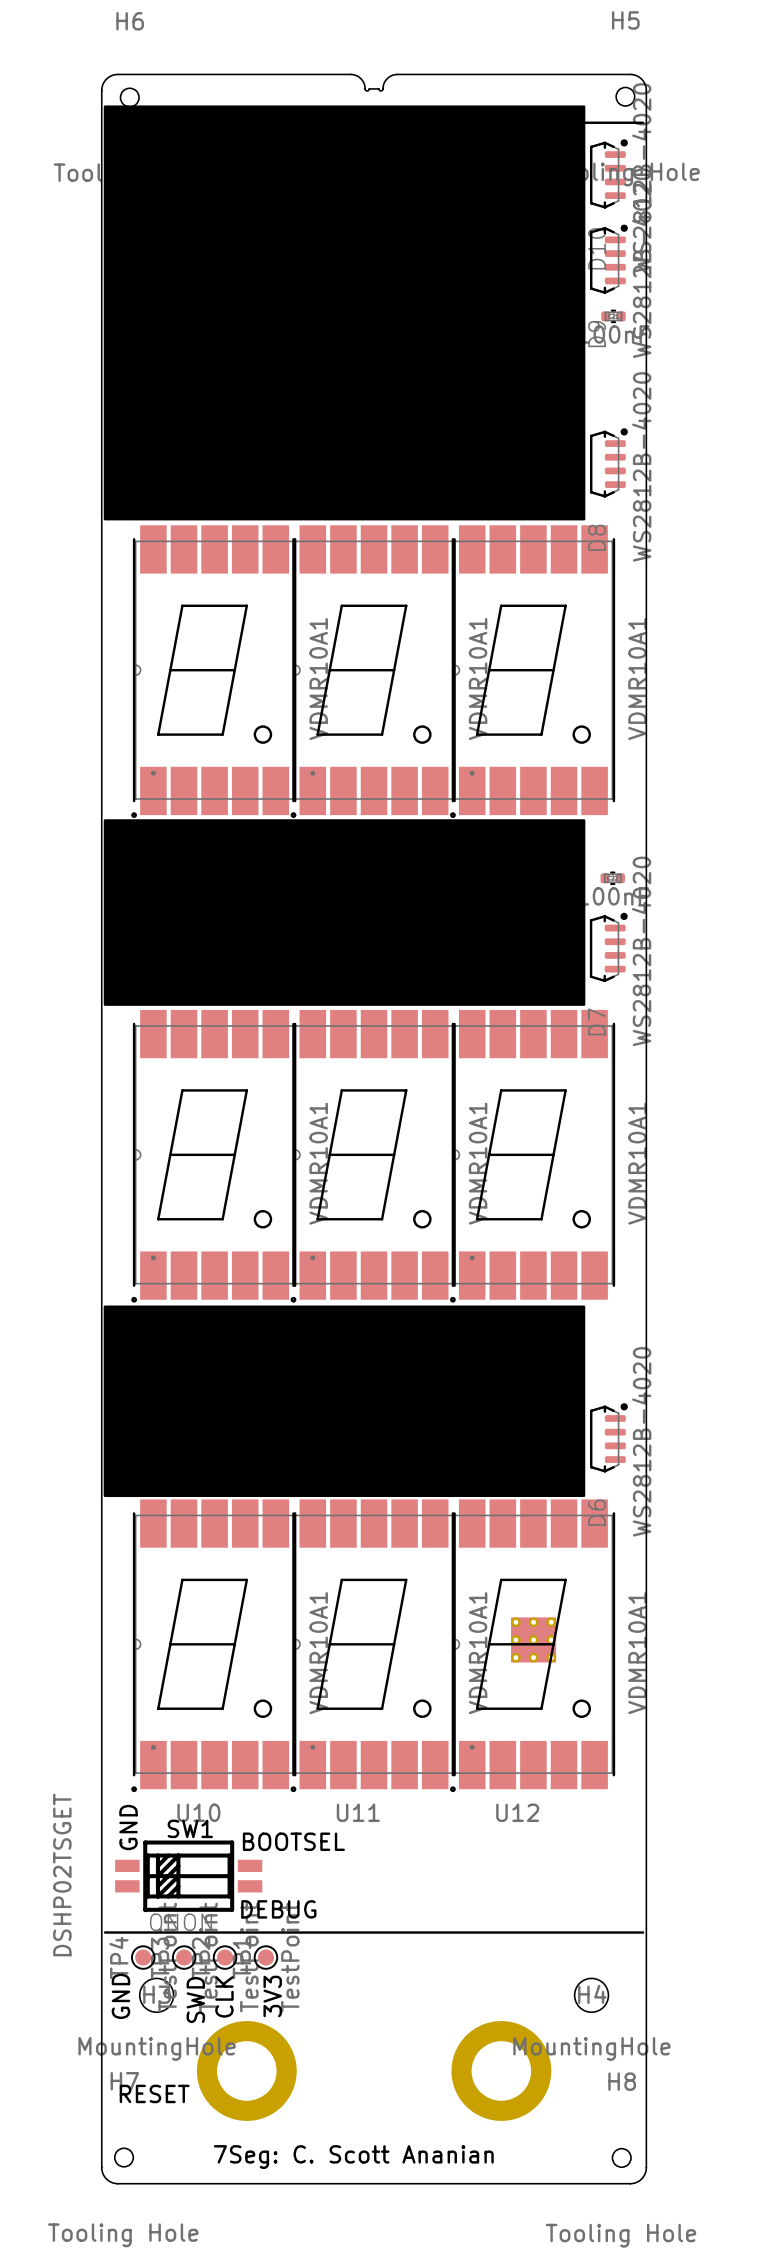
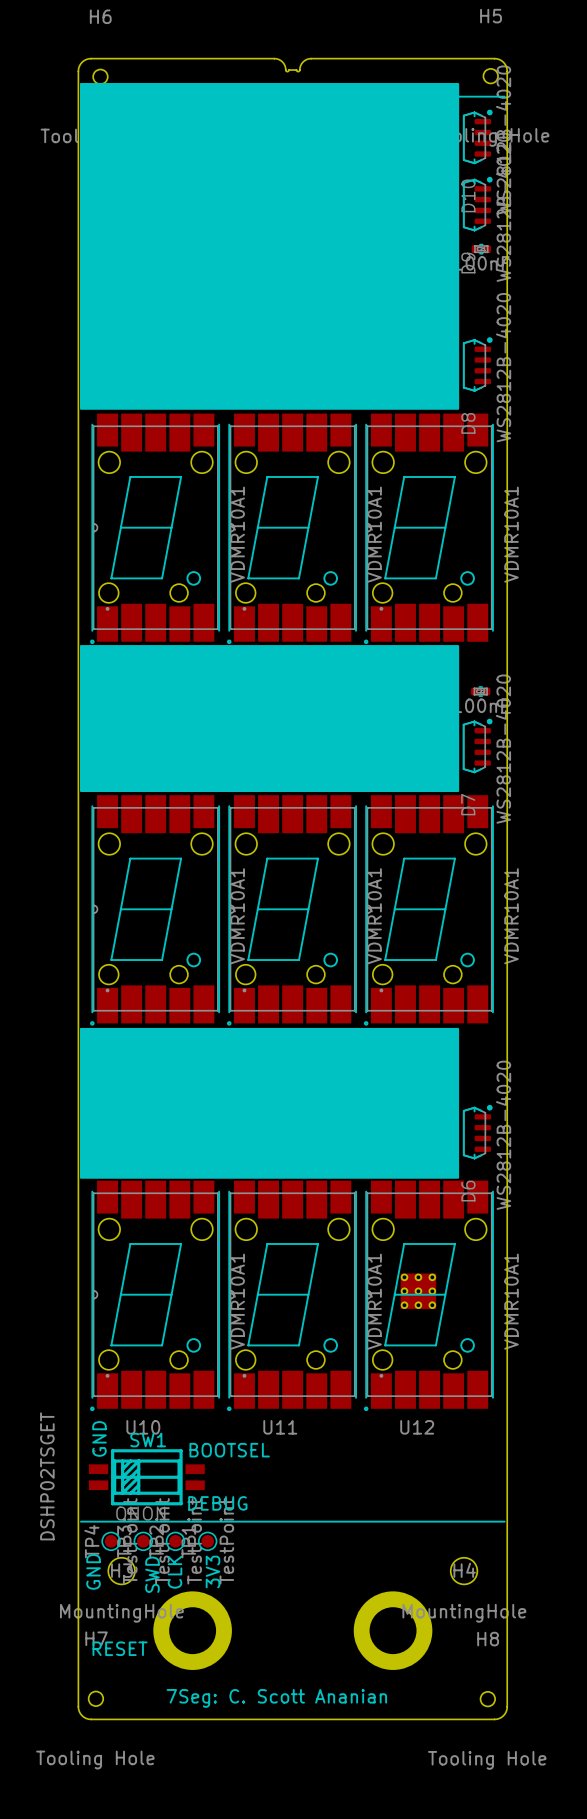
part footprint: [131, 525, 297, 818] -> [90, 413, 221, 645]
part footprint: [290, 525, 456, 818] -> [227, 413, 358, 645]
part footprint: [450, 525, 616, 818] -> [363, 413, 494, 645]
part footprint: [131, 1009, 297, 1303] -> [90, 795, 221, 1026]
part footprint: [290, 1009, 456, 1303] -> [227, 795, 358, 1026]
part footprint: [450, 1009, 616, 1303] -> [363, 795, 494, 1026]
U10 footprint: [131, 1499, 297, 1793] -> [90, 1180, 221, 1412]
U11 footprint: [290, 1499, 456, 1793] -> [227, 1180, 358, 1412]
U12 footprint: [450, 1499, 616, 1793] -> [363, 1180, 494, 1412]

